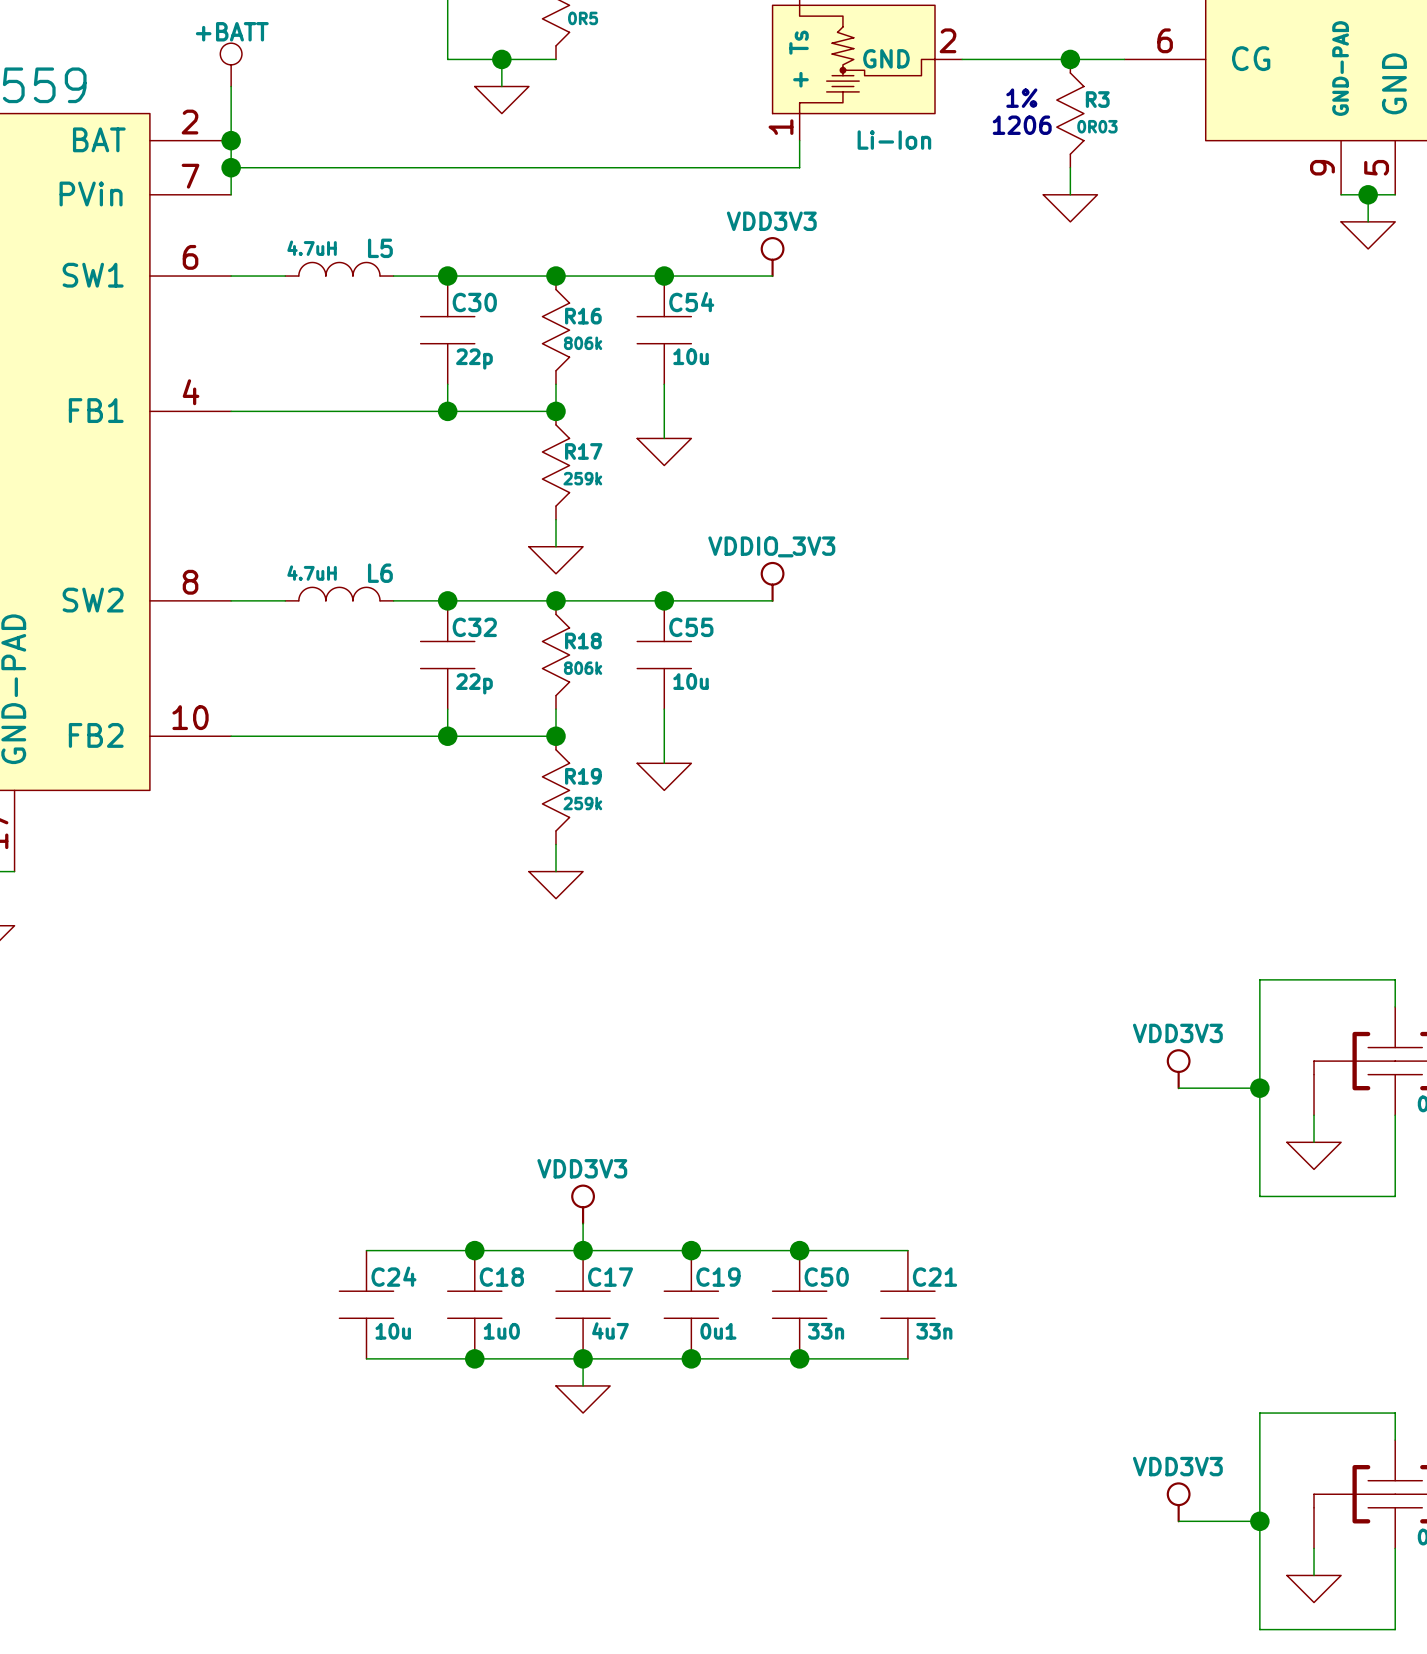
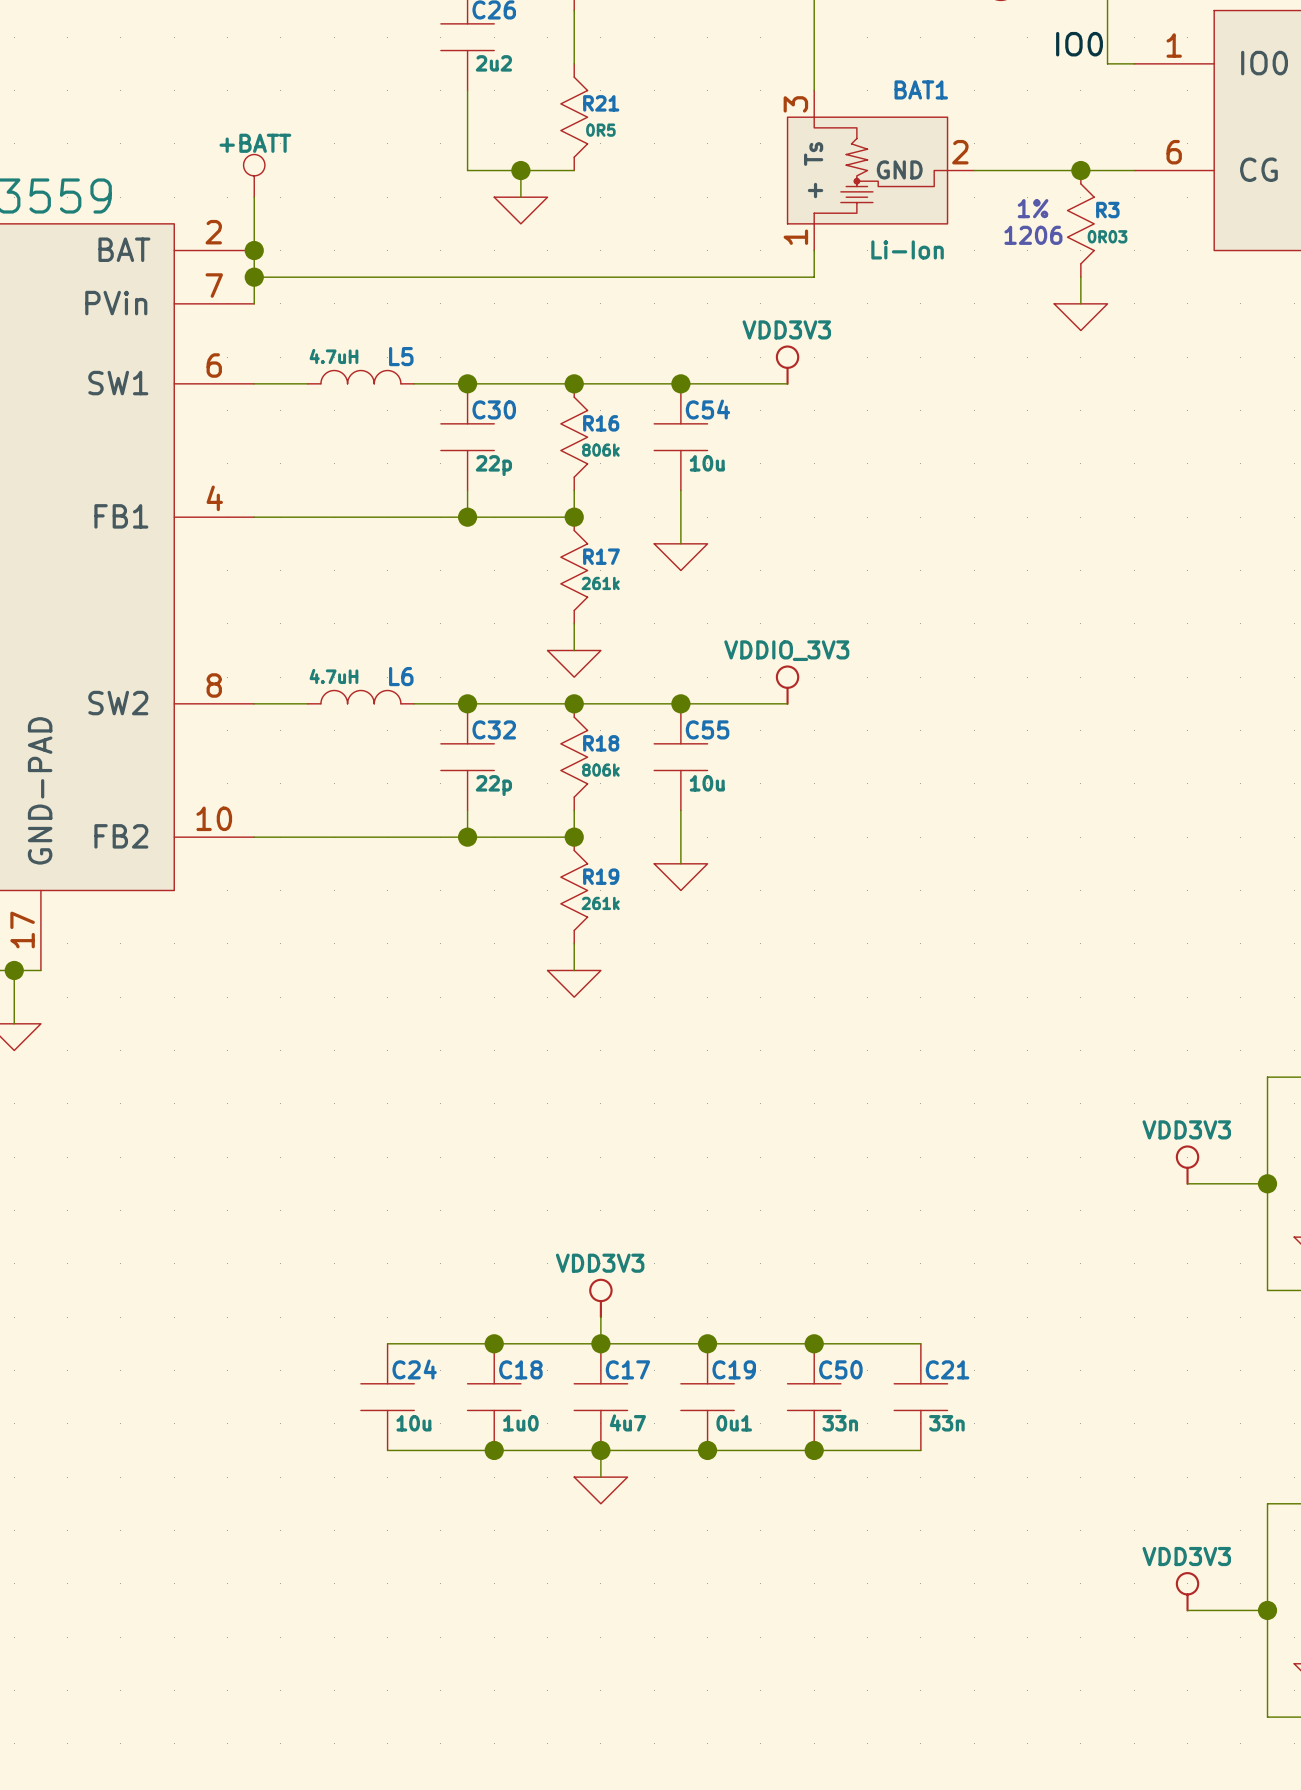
R17 value: 259k (582, 478) -> 261k (600, 583)
R19 value: 259k (582, 803) -> 261k (600, 903)

